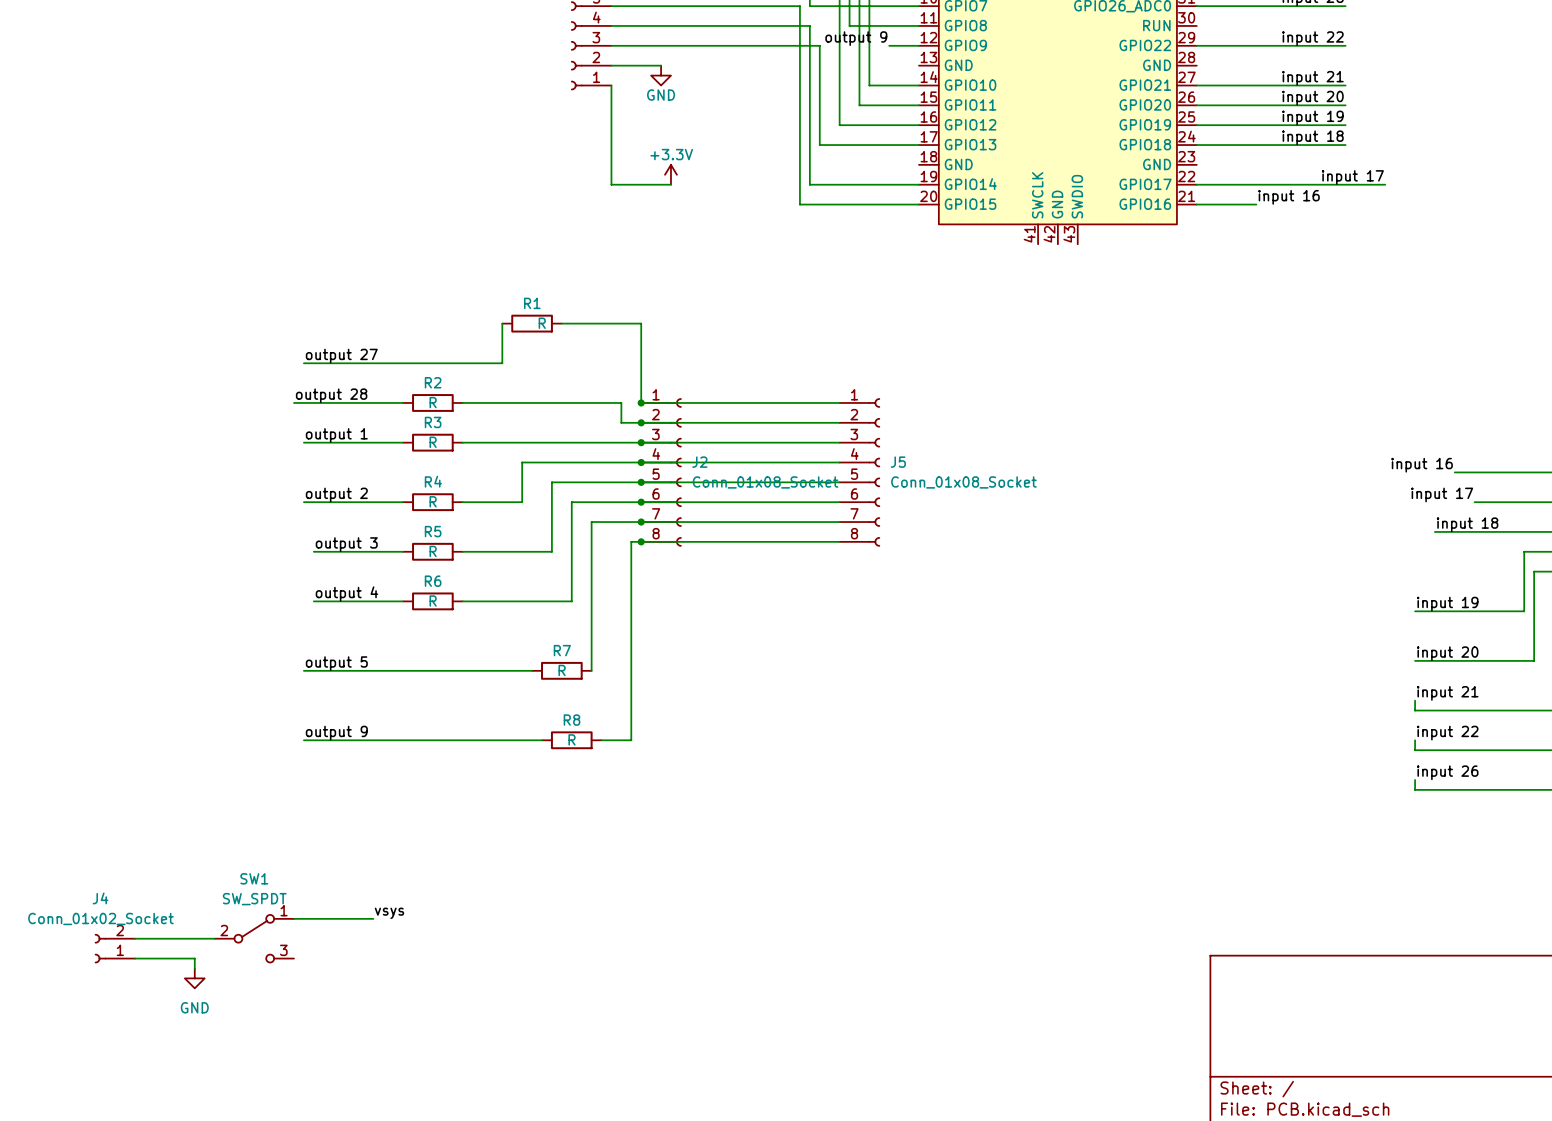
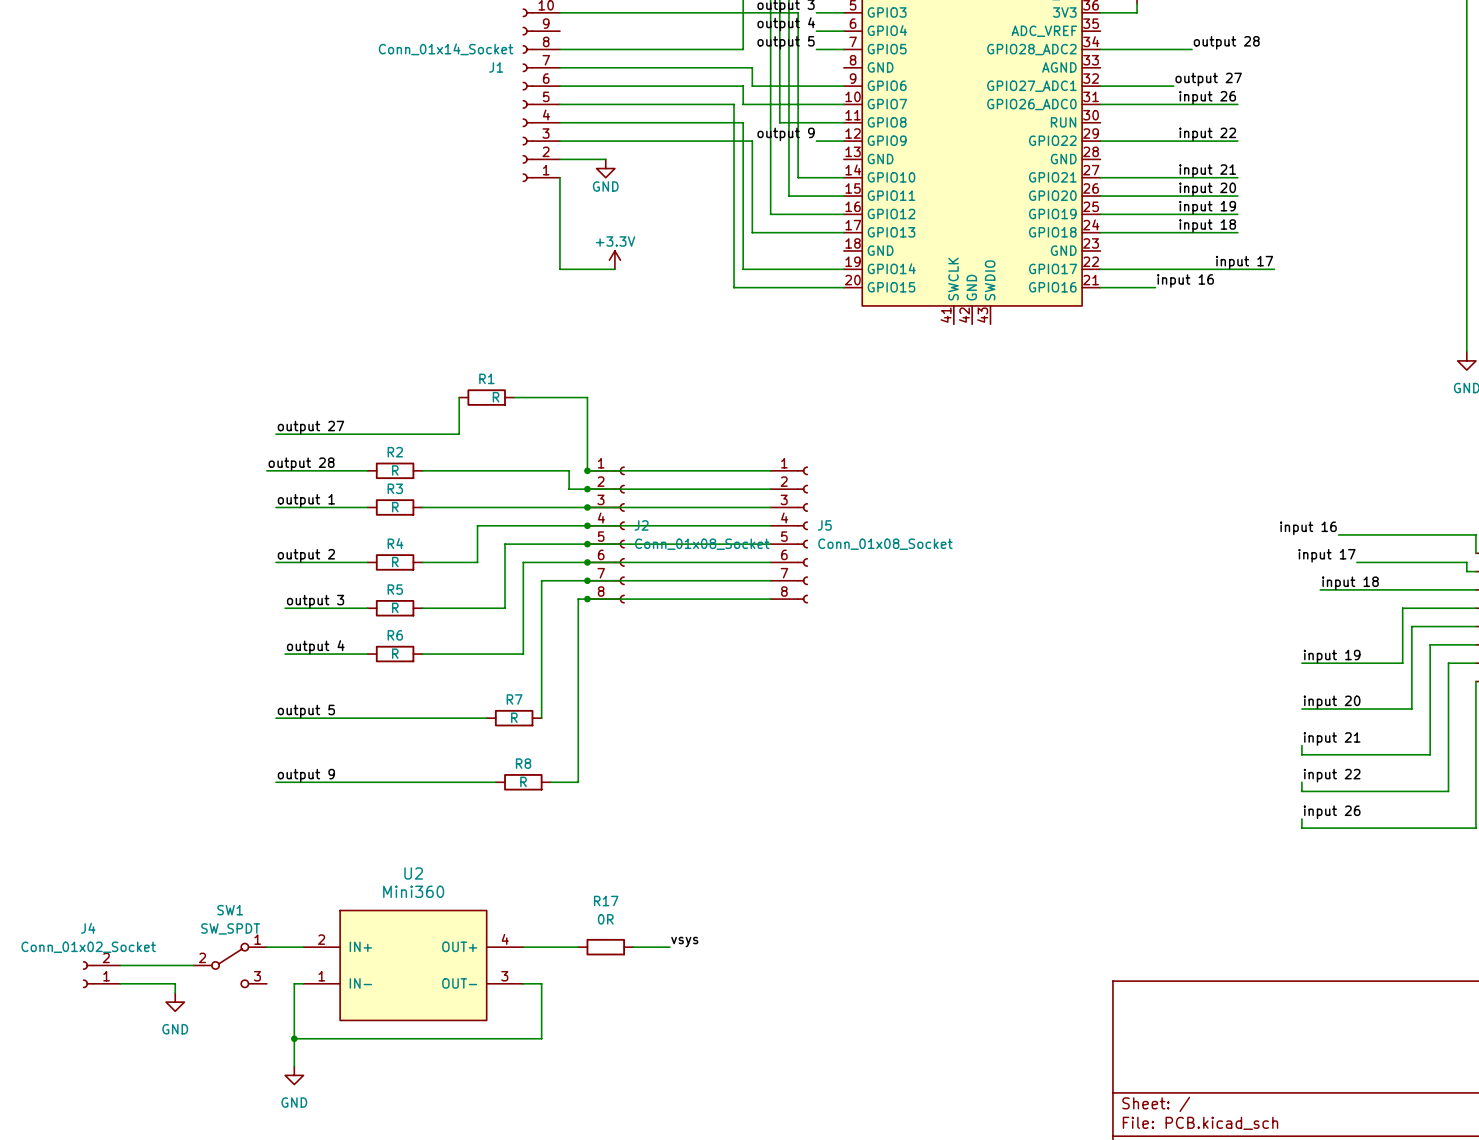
label: vsys (389, 913) -> none
label: none -> vsys (684, 942)
wire: none -> (523, 947) (578, 947)
R17: none -> 0R (605, 947)
wire: none -> (633, 947) (669, 947)
U2: none -> Mini360 (413, 965)
wire: none -> (303, 983) (294, 983) (294, 1066)
wire: none -> (523, 983) (541, 983) (541, 1038) (294, 1038)
junction: none -> (294, 1038)
power symbol: none -> GND (294, 1075)

